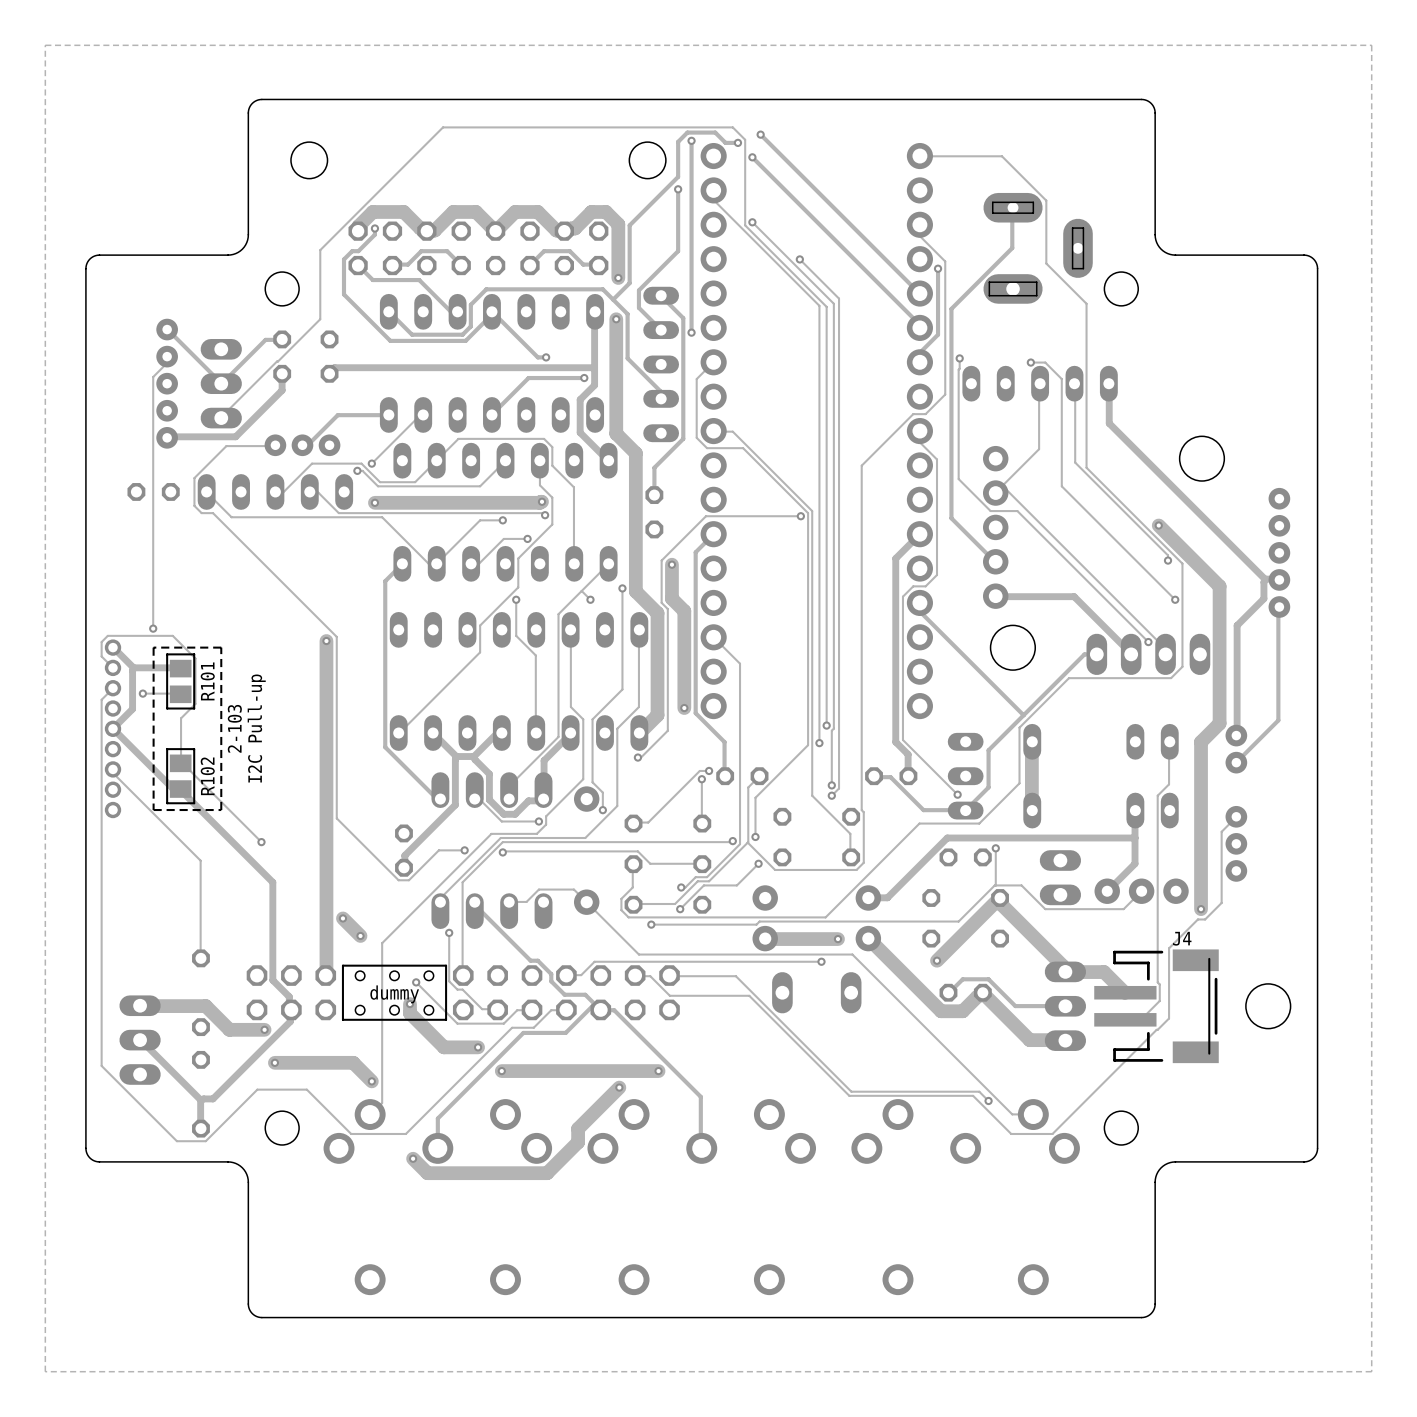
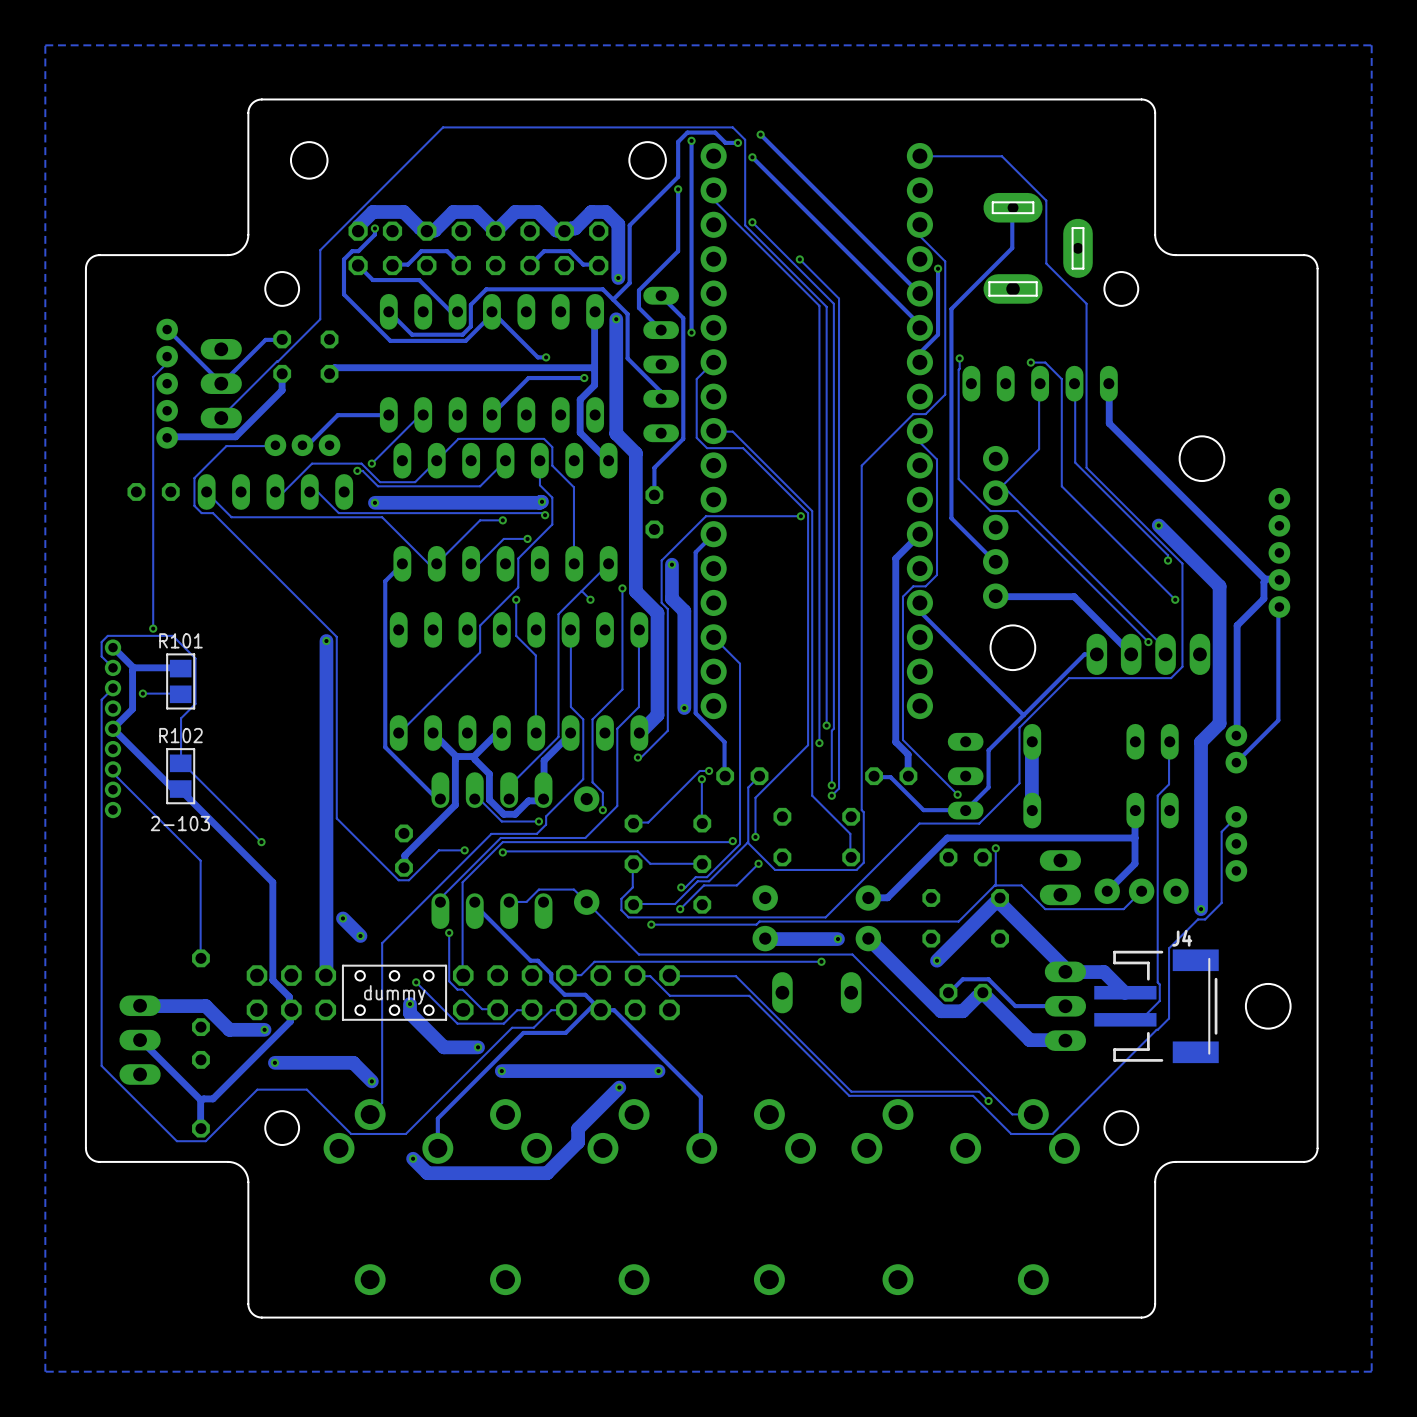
line: (221, 647) (153, 647) (153, 810) (221, 810) (221, 647) -> none
R101 name rotation: 0° (207, 681) -> 90° clockwise (180, 640)
text rotation: 0° (234, 728) -> 90° clockwise (180, 823)
text position: 2-103 (234, 728) -> 2-103 (180, 823)
text: I2C Pull-up (256, 728) -> none
R102 name rotation: 0° (207, 776) -> 90° clockwise (180, 735)

